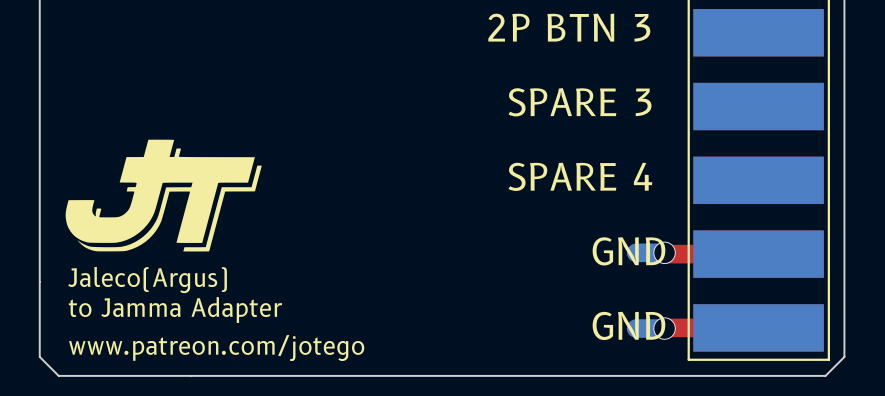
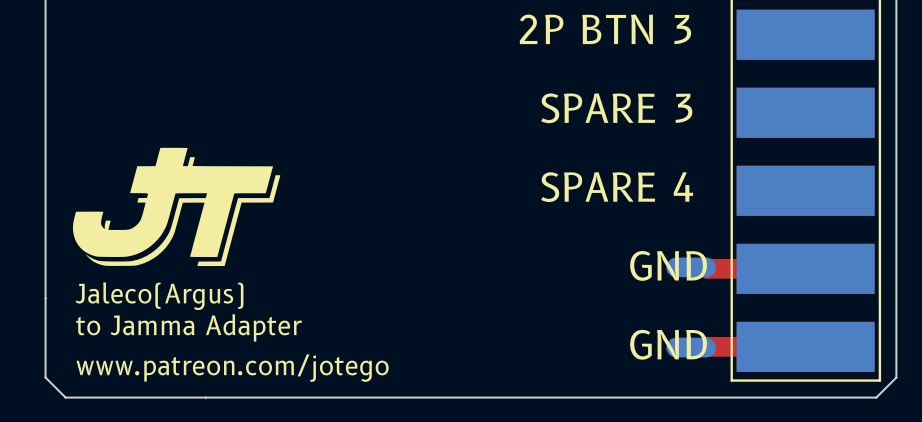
via: (664, 252) -> none
via: (664, 328) -> none

